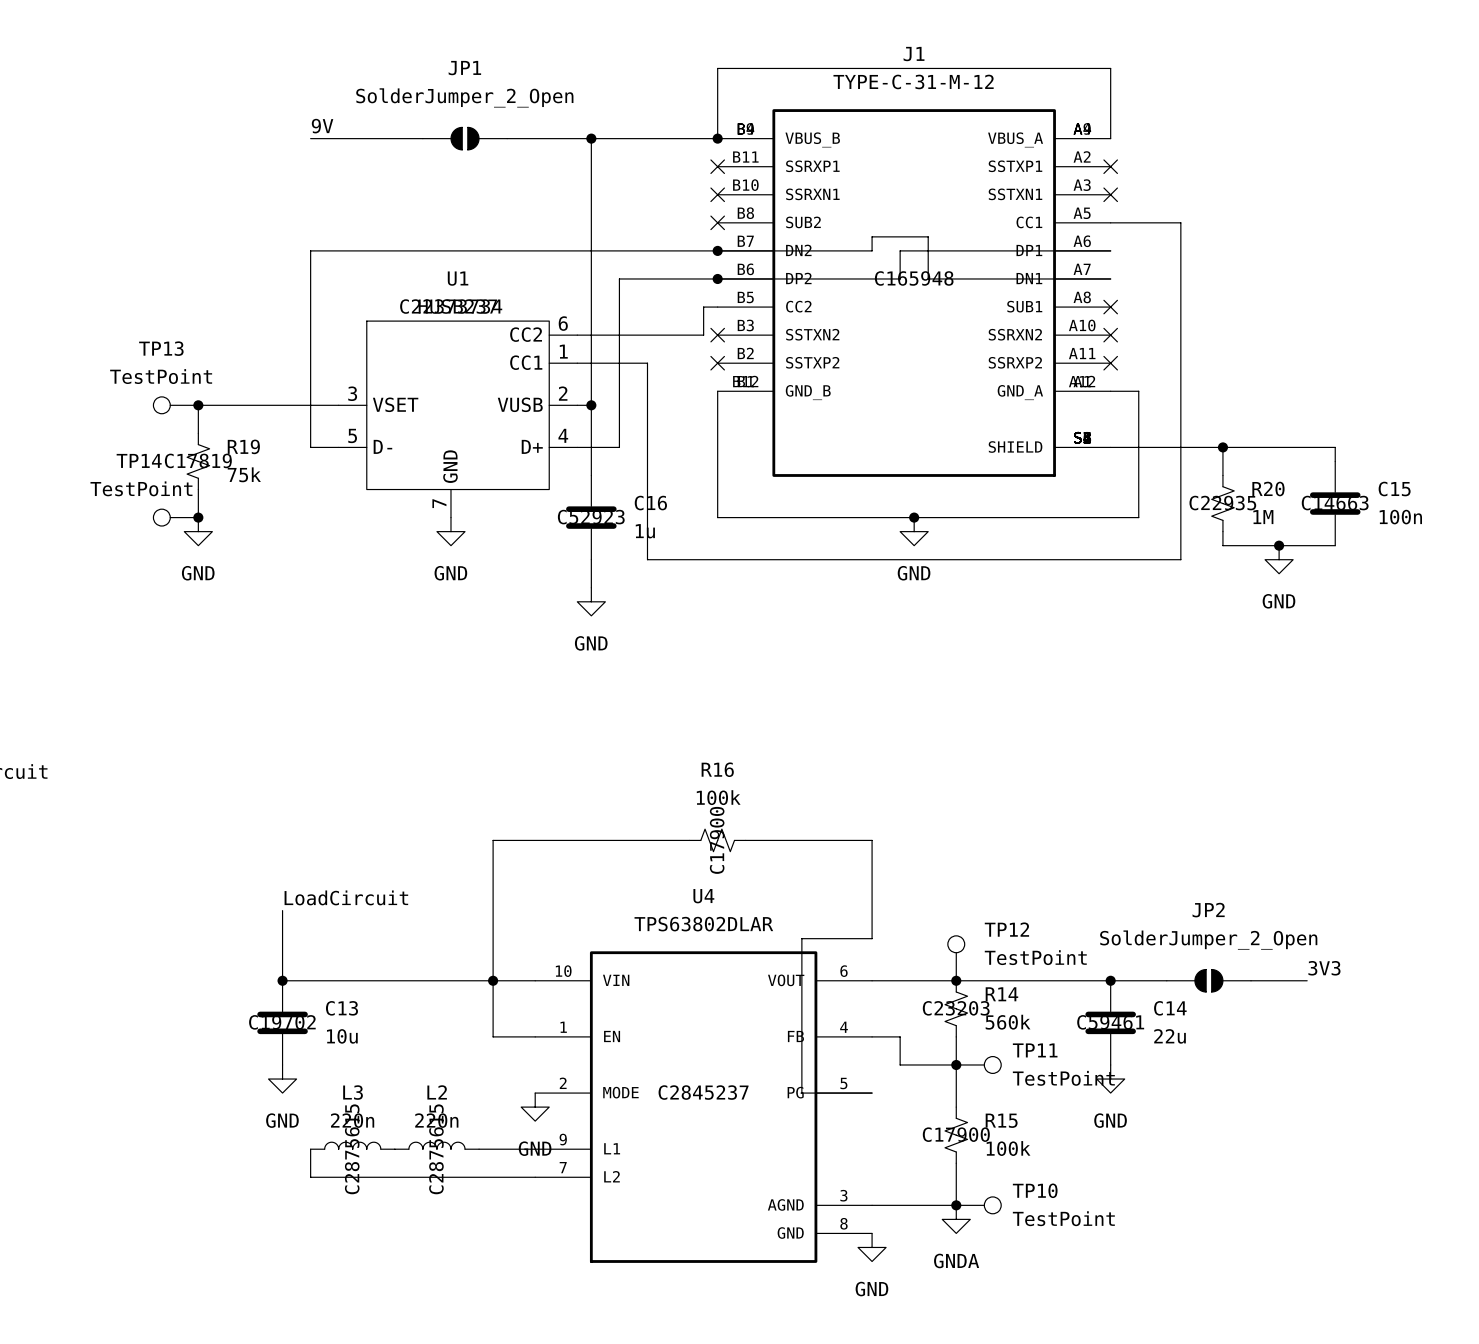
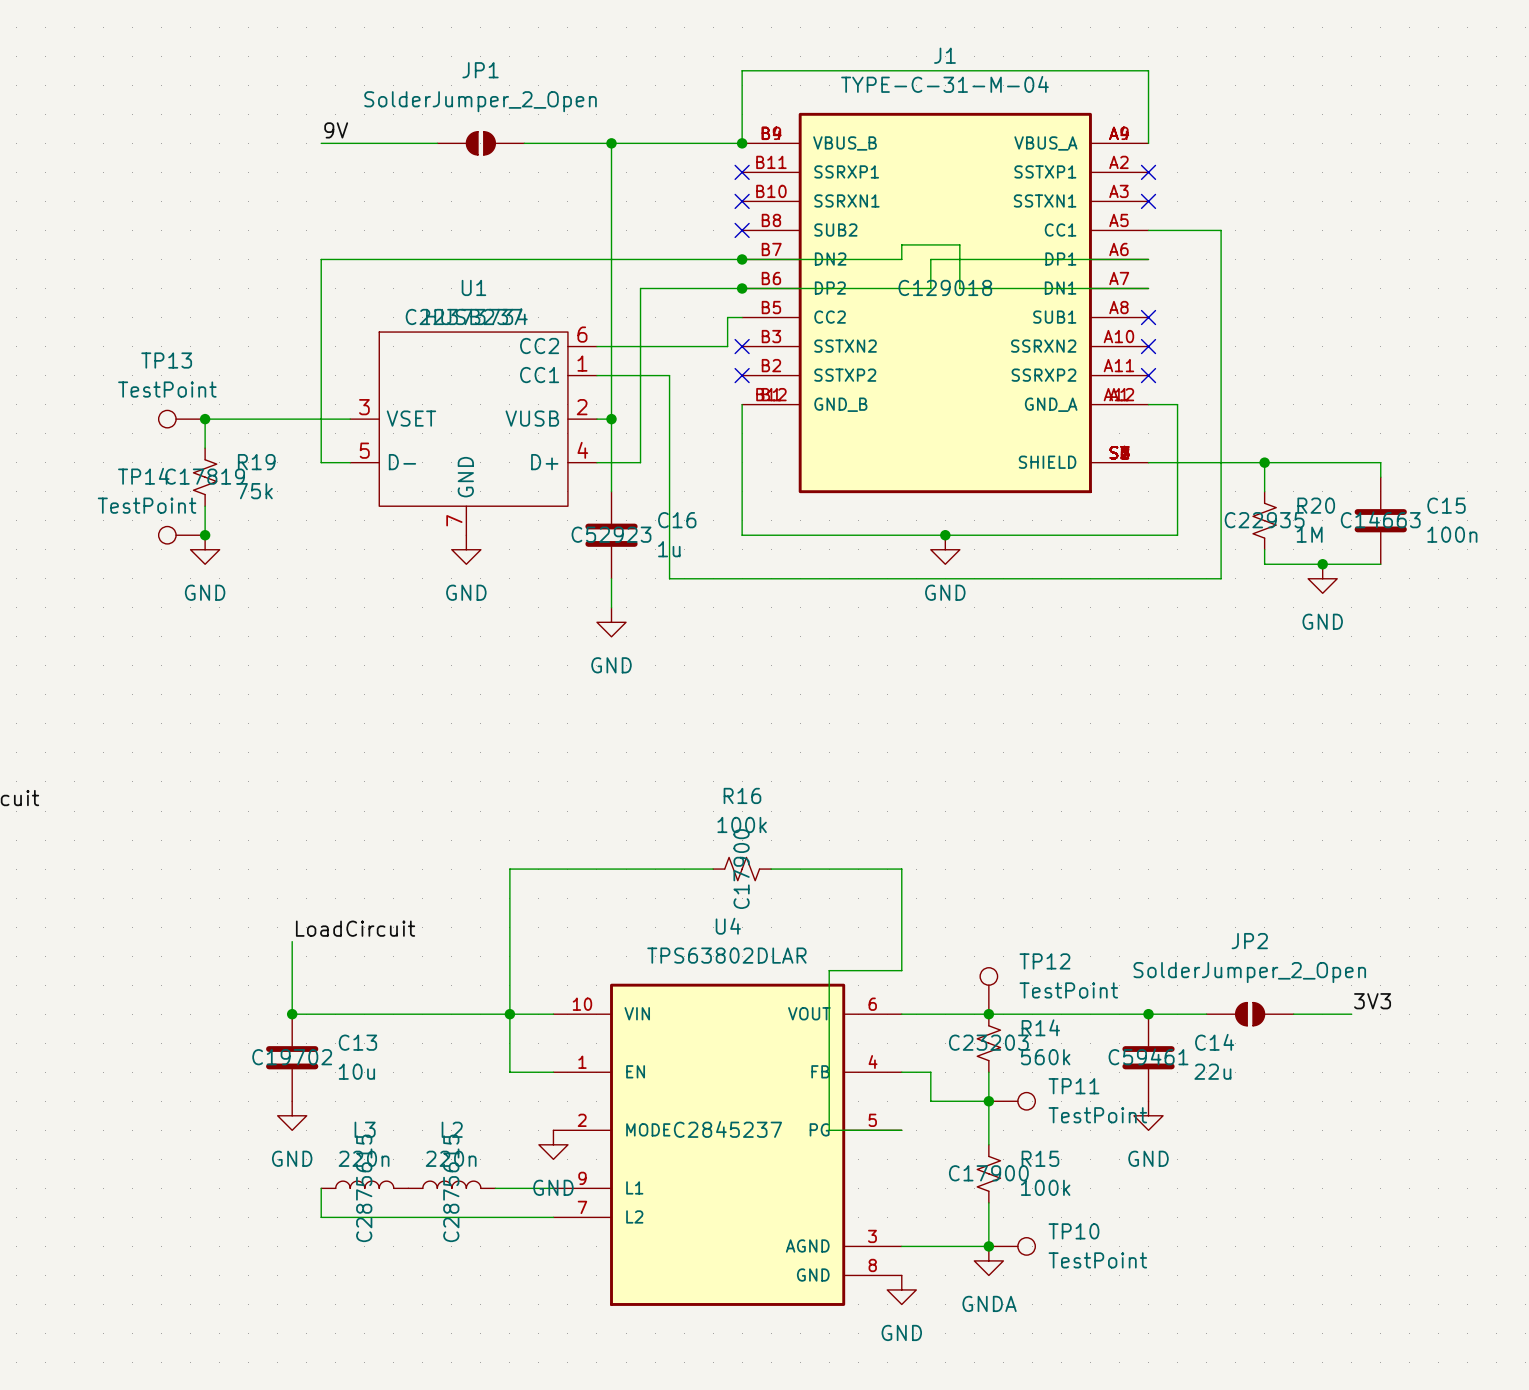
J1 value: TYPE-C-31-M-12 (913, 81) -> TYPE-C-31-M-04 (944, 84)
J1 text: C165948 (914, 278) -> C129018 (945, 287)

